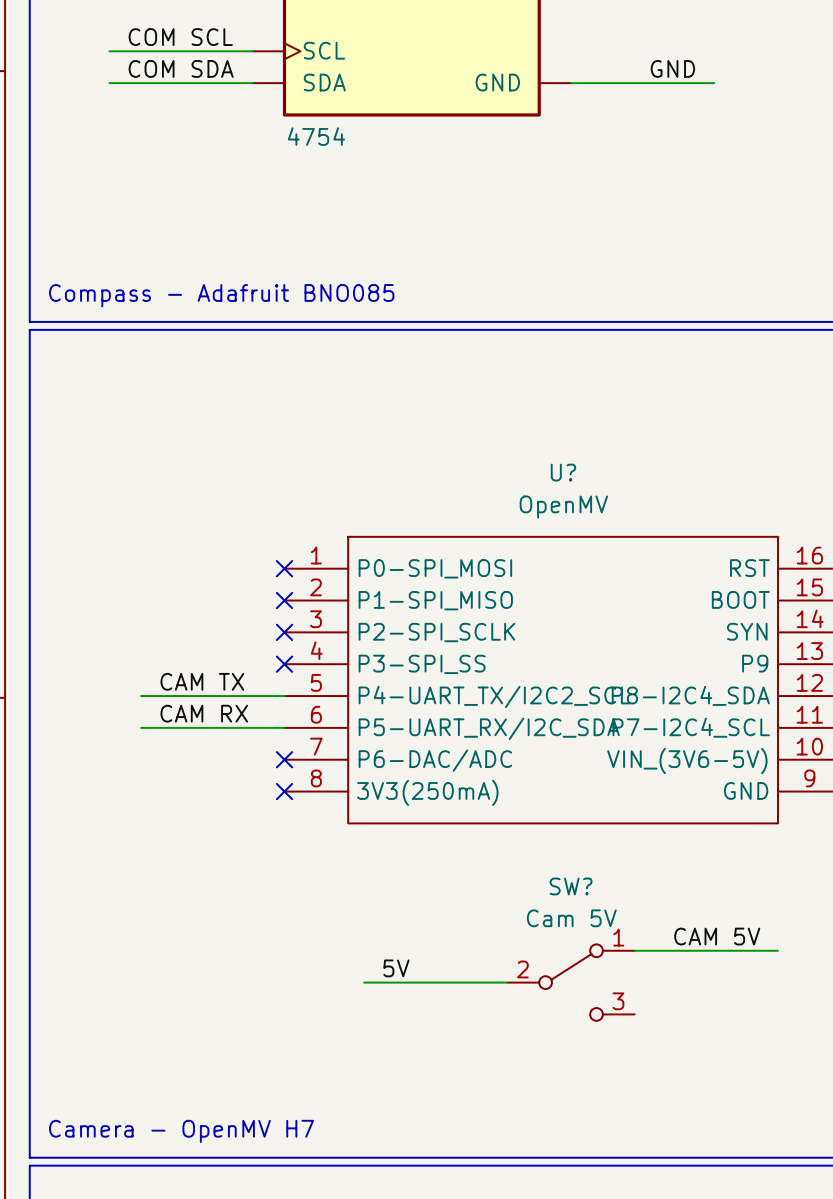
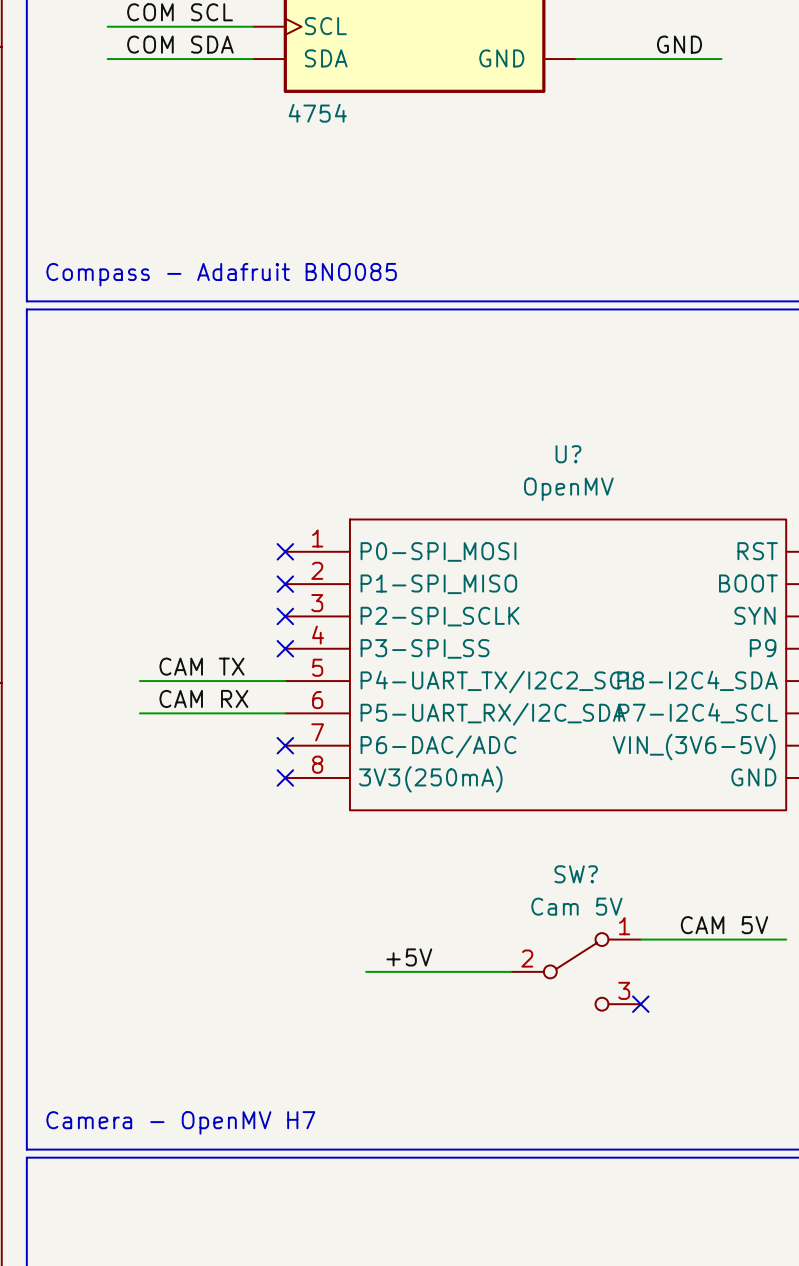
label: 5V (396, 968) -> +5V (409, 957)
no-connect mark: none -> (640, 1004)

